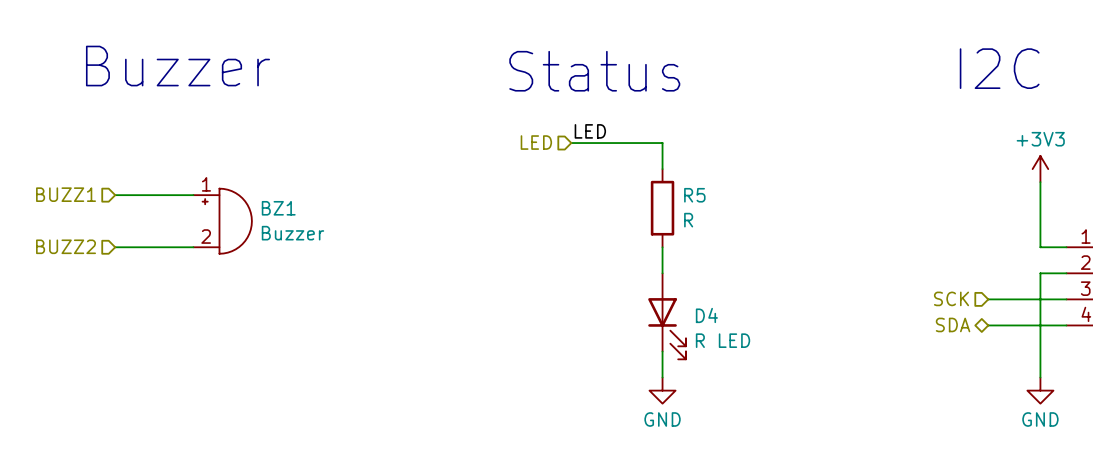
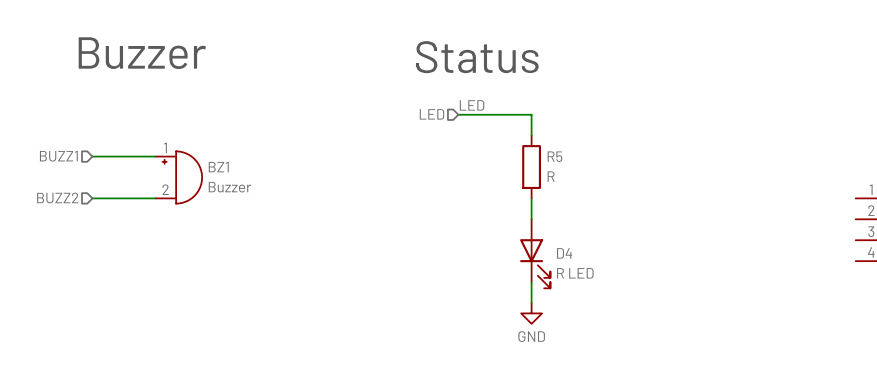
text: I2C (999, 68) -> none
power symbol: +3V3 (1040, 169) -> none
wire: (1040, 182) (1040, 247) (1066, 247) -> none
wire: (1066, 273) (1040, 273) (1040, 377) -> none
hierarchical label: SCK (951, 298) -> none
wire: (988, 299) (1066, 299) -> none
hierarchical label: SDA (953, 324) -> none
wire: (988, 325) (1066, 325) -> none
power symbol: GND (1040, 390) -> none

